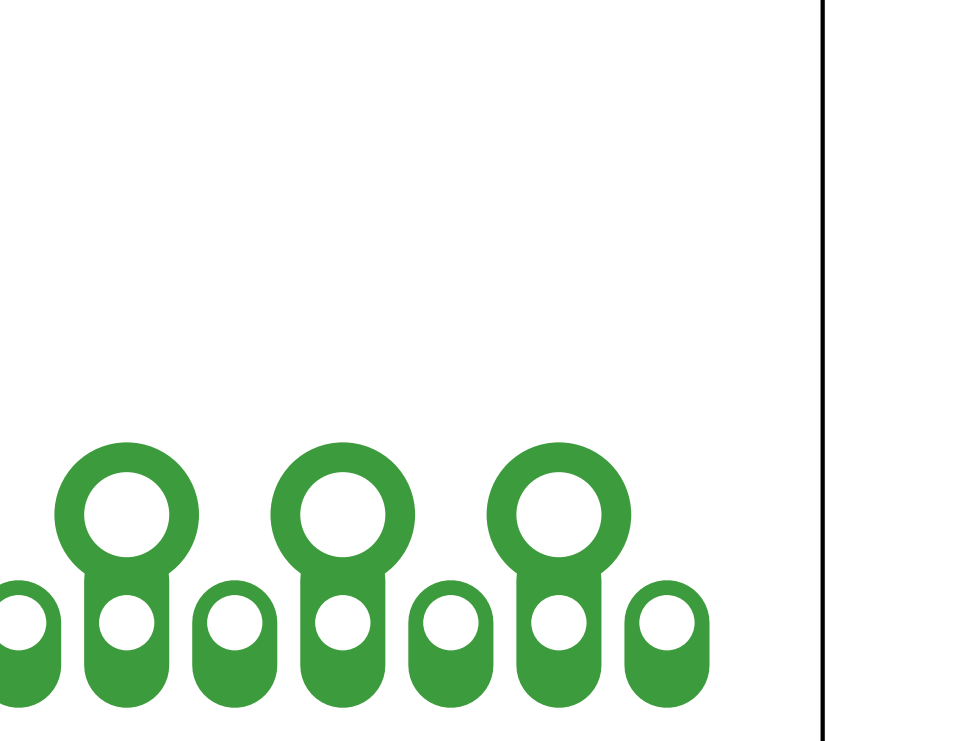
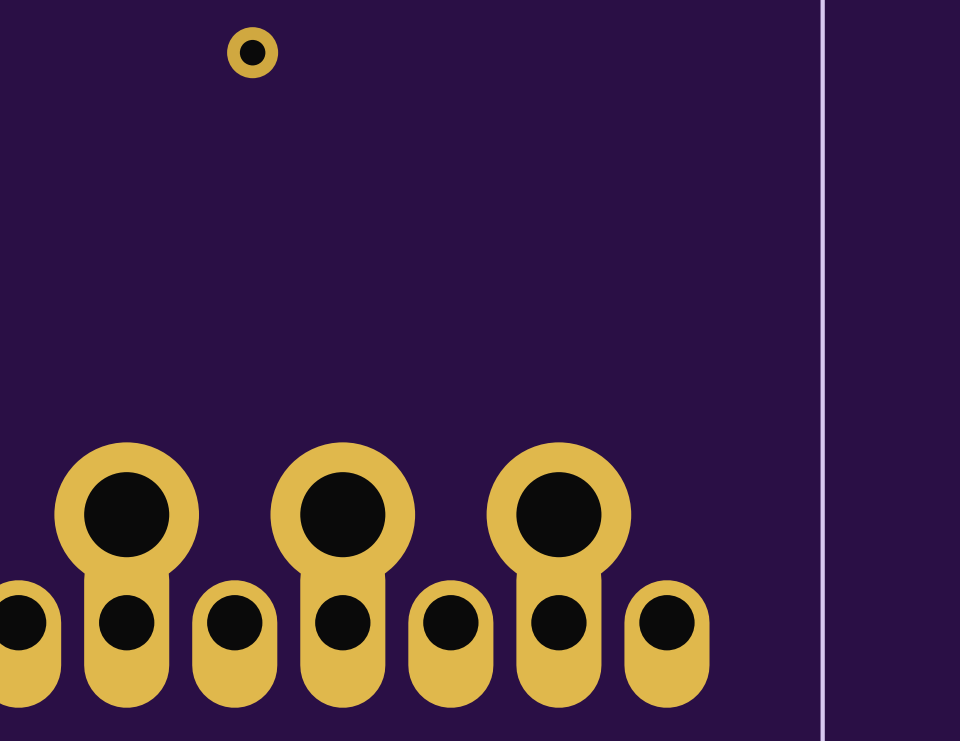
via: none -> (252, 52)

